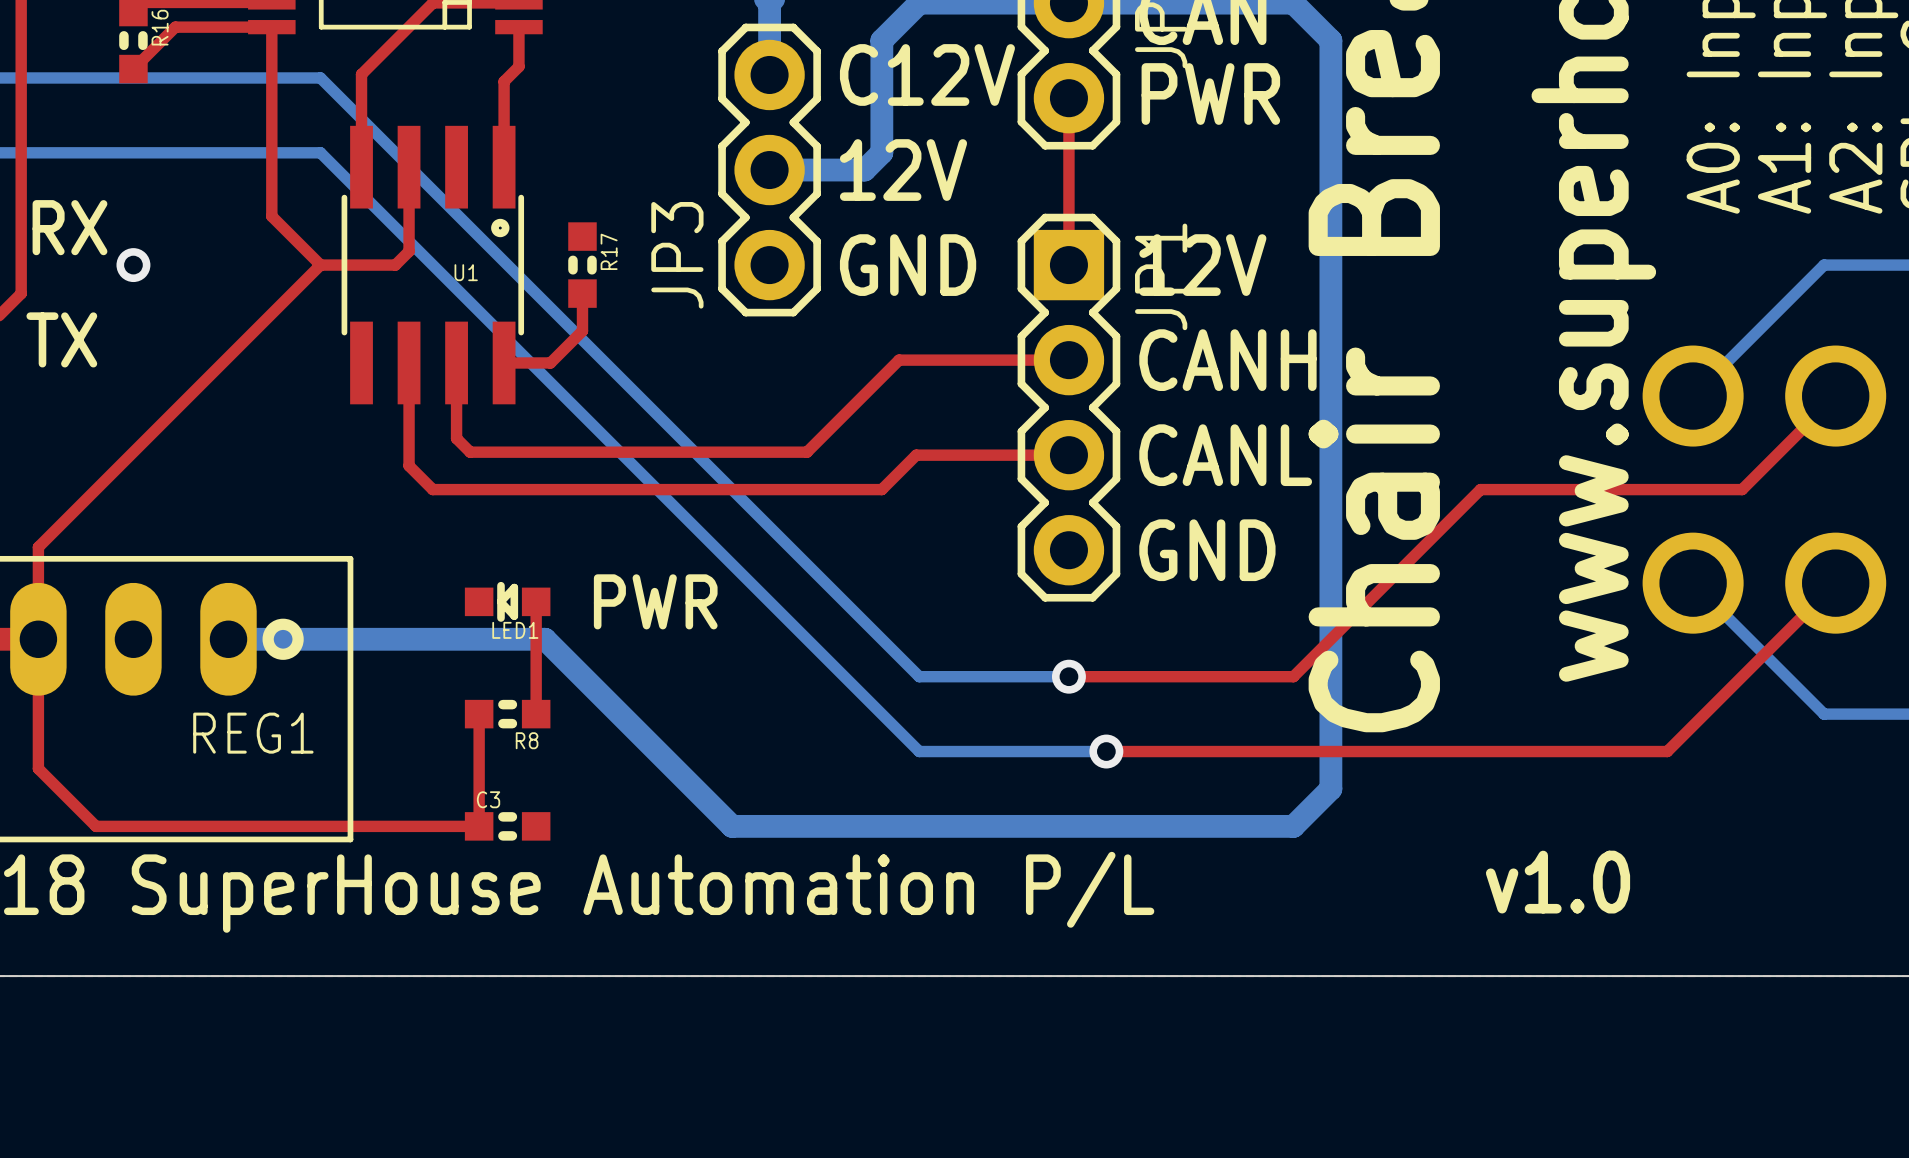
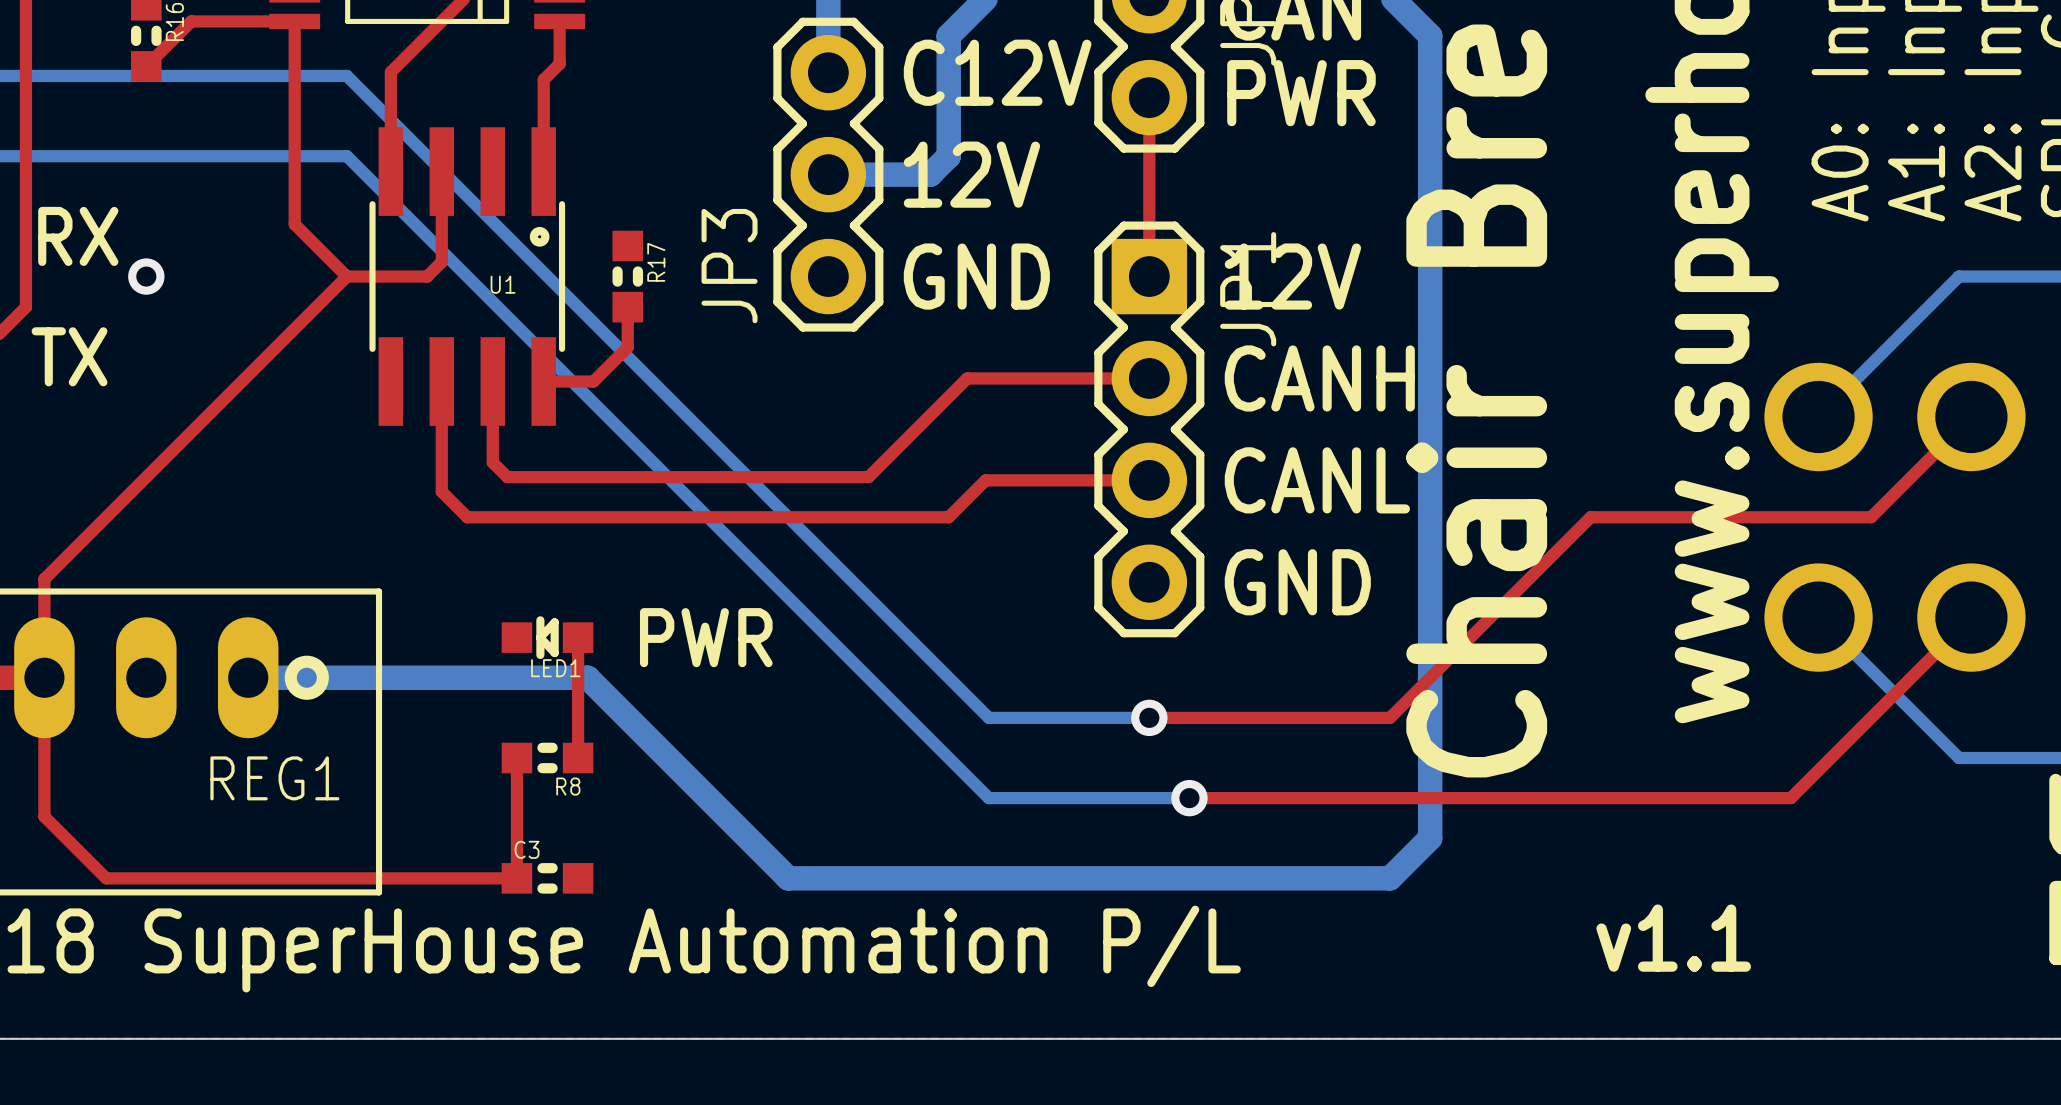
text: v1.0 (1558, 882) -> v1.1 (1673, 938)

